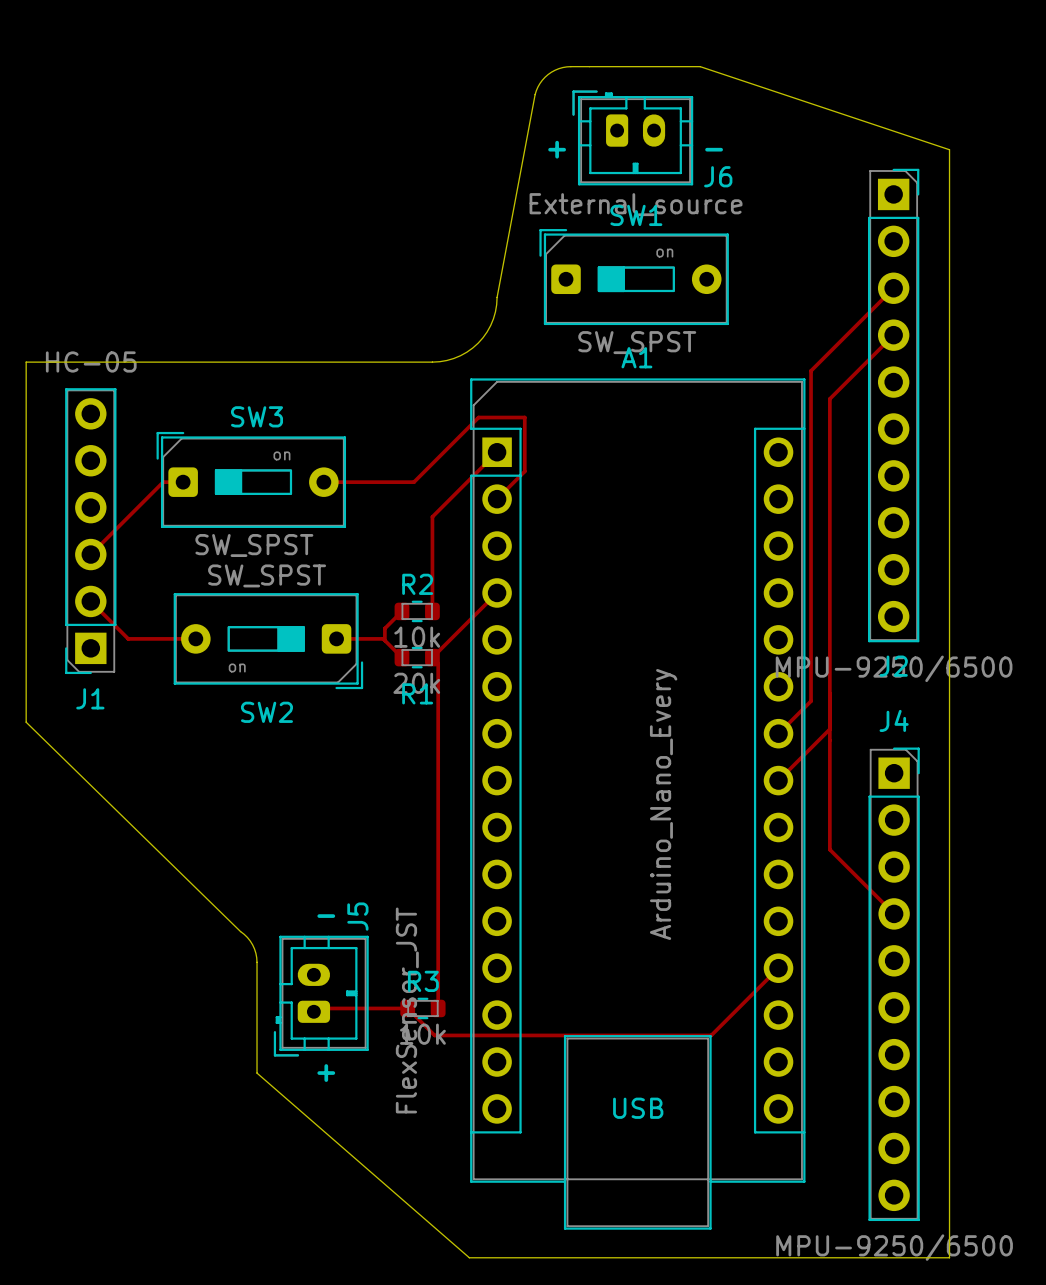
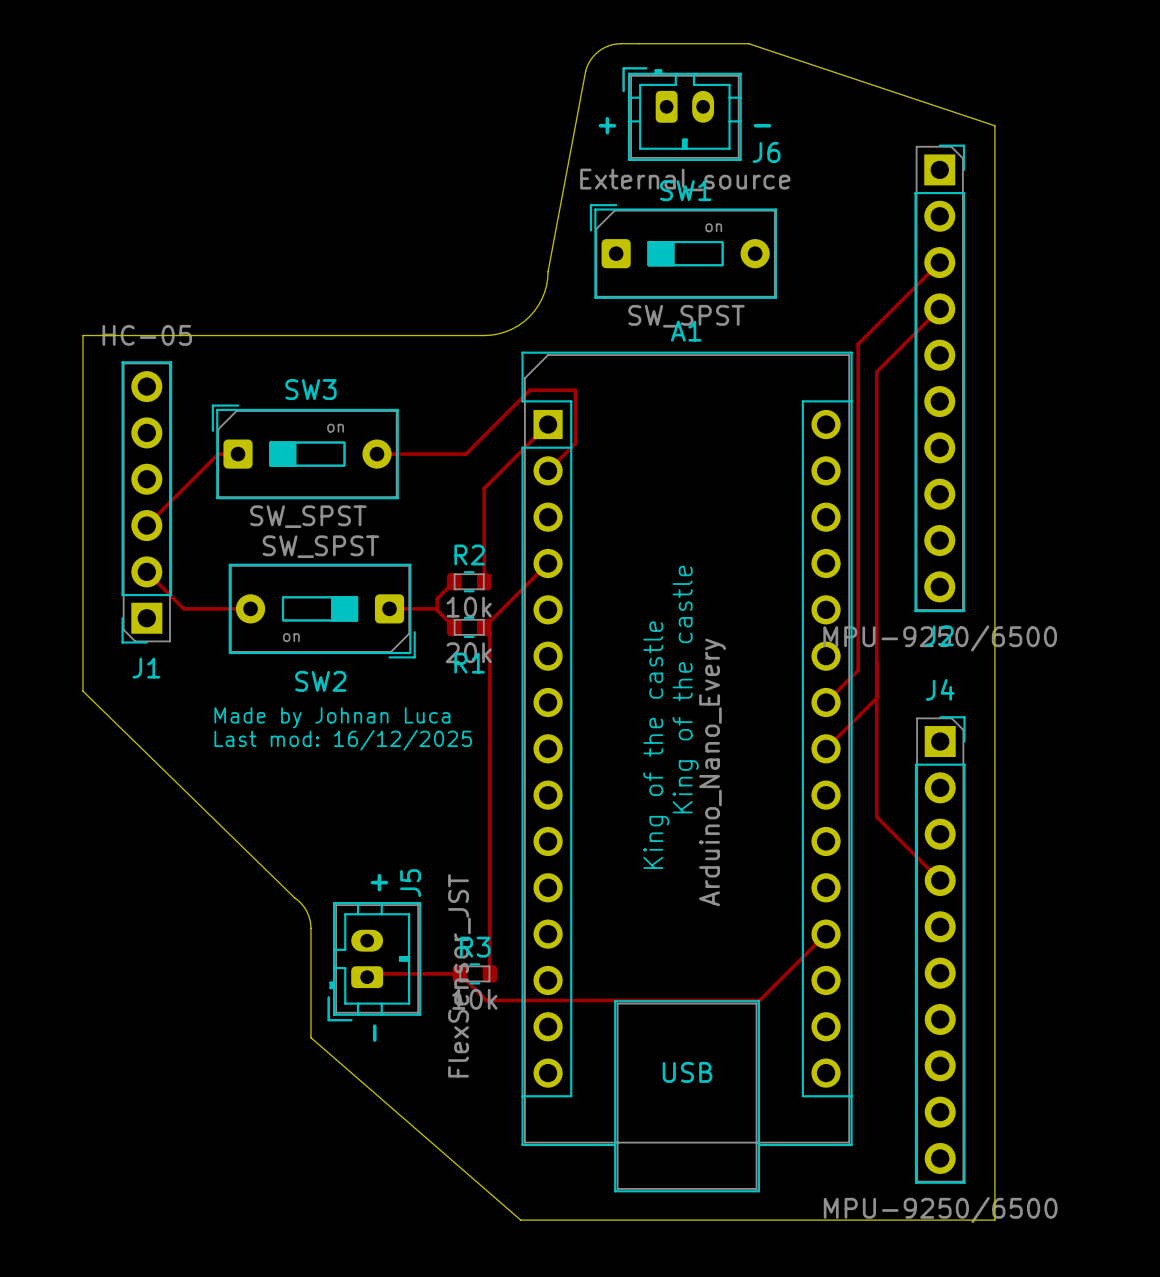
text: none -> King of the castle (685, 689)
text: none -> Made by Johnan Luca (332, 717)
text: none -> Last mod: 16/12/2025 (343, 740)
text: none -> King of the castle (656, 745)
text: - (326, 916) -> + (379, 882)
text: + (326, 1073) -> - (374, 1033)

